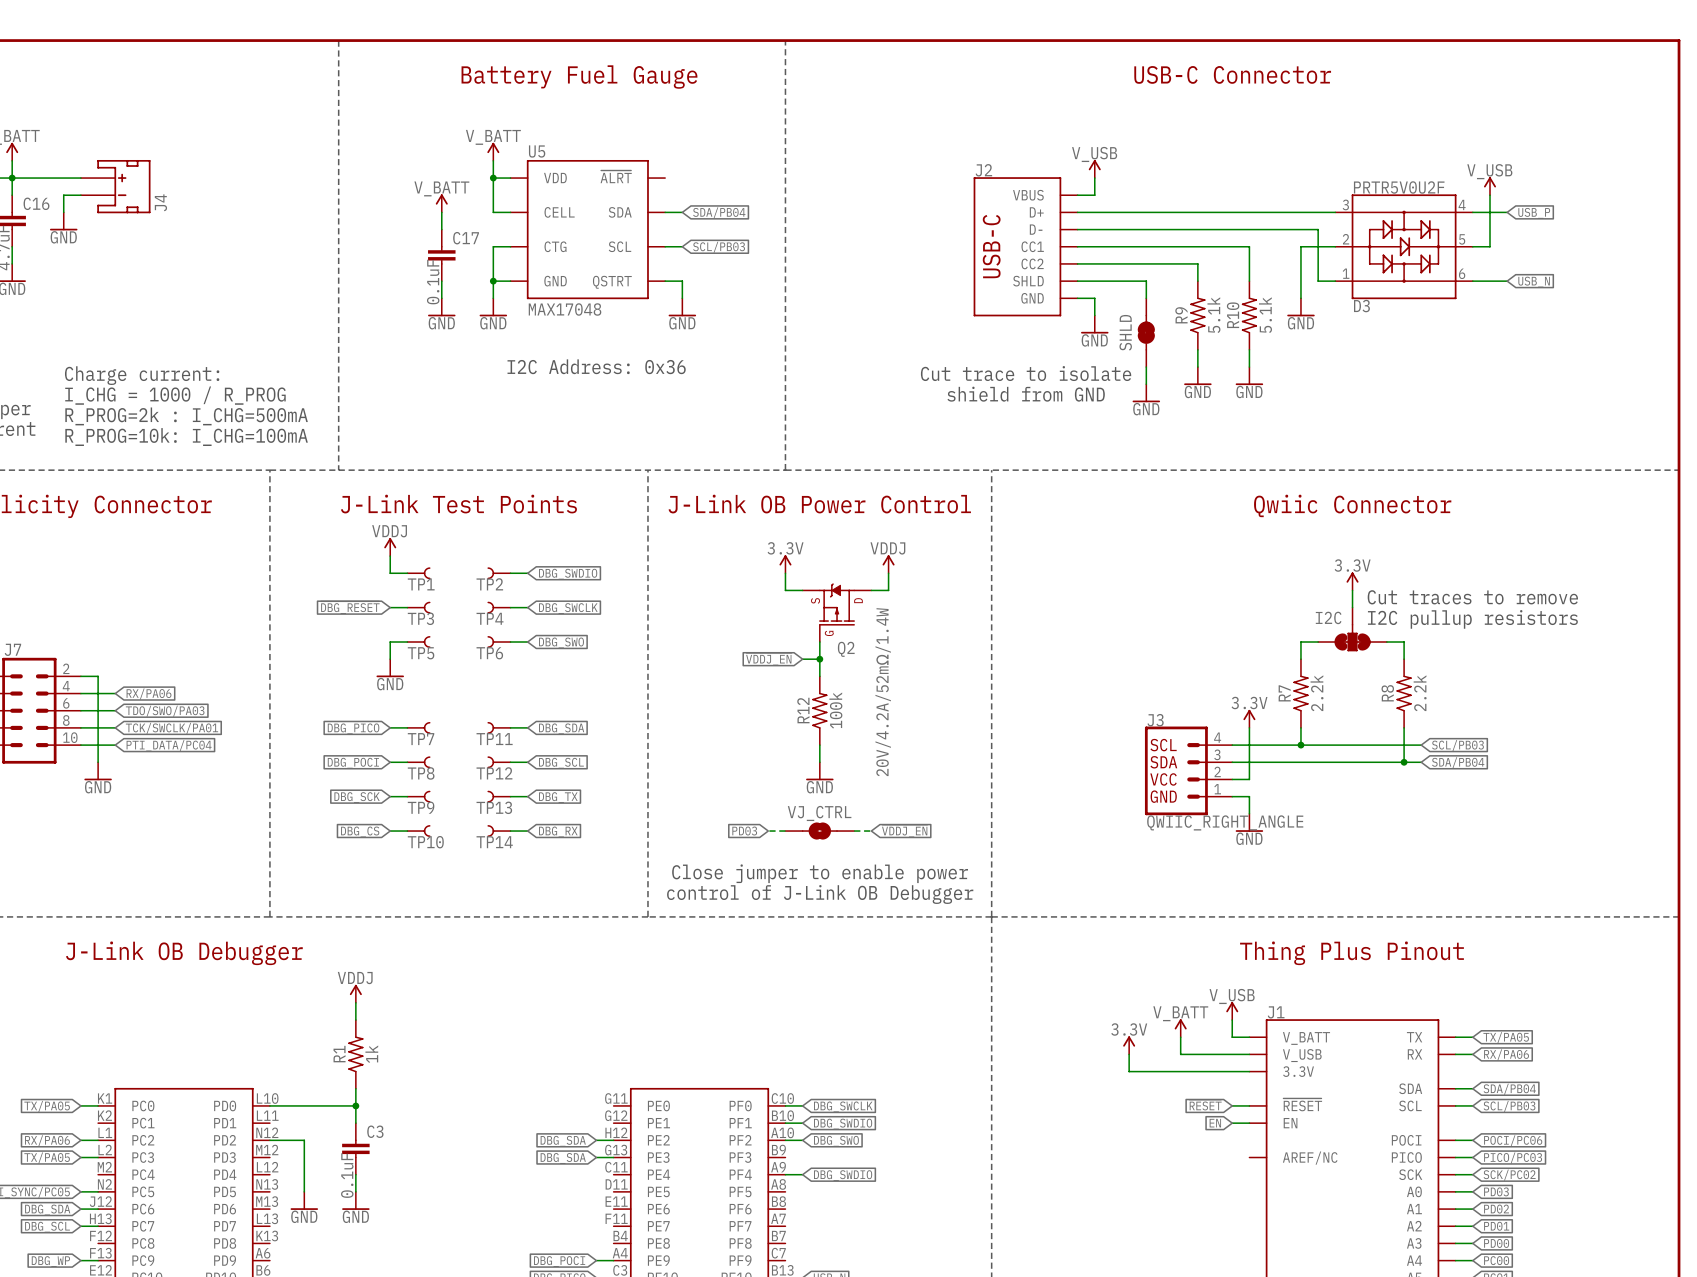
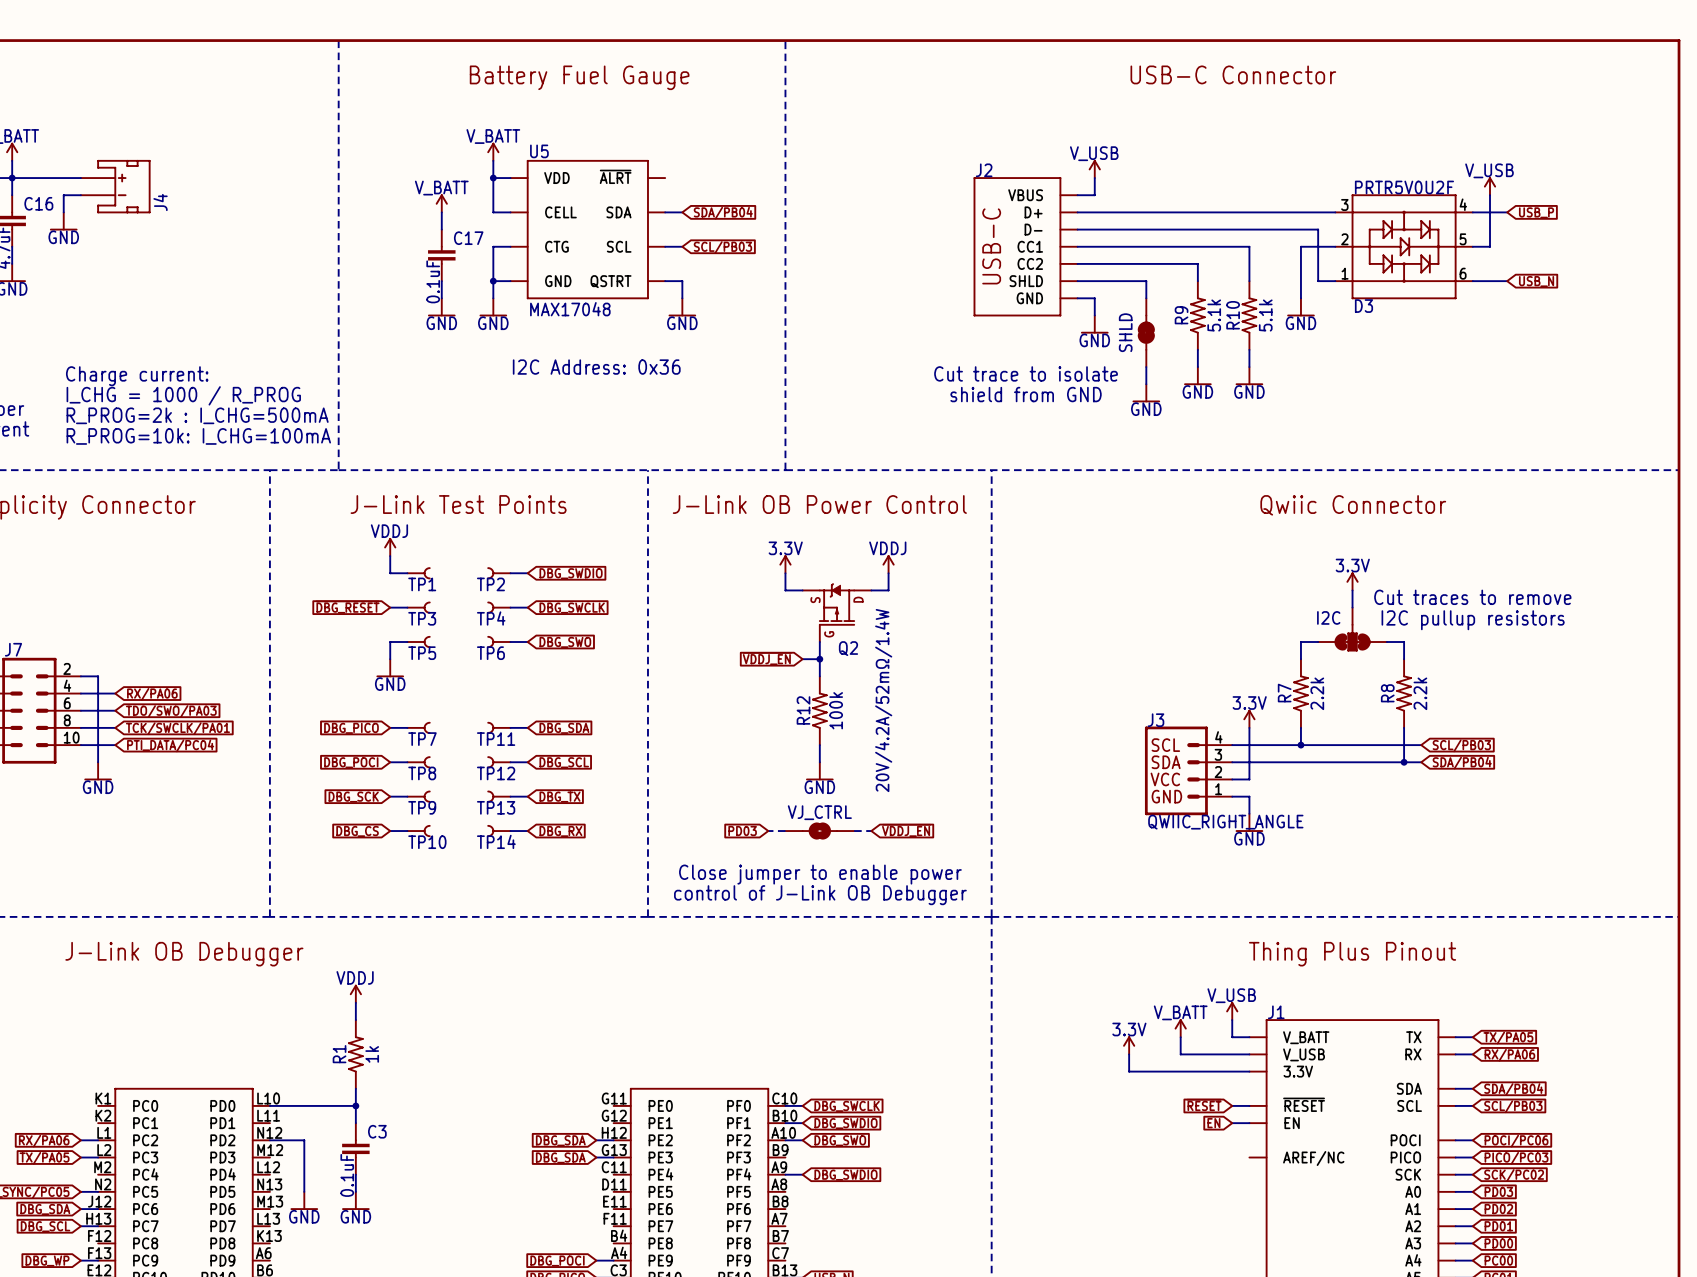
wire: (80, 1105) (98, 1105) -> none
global label: TX/PA05 (47, 1106) -> none

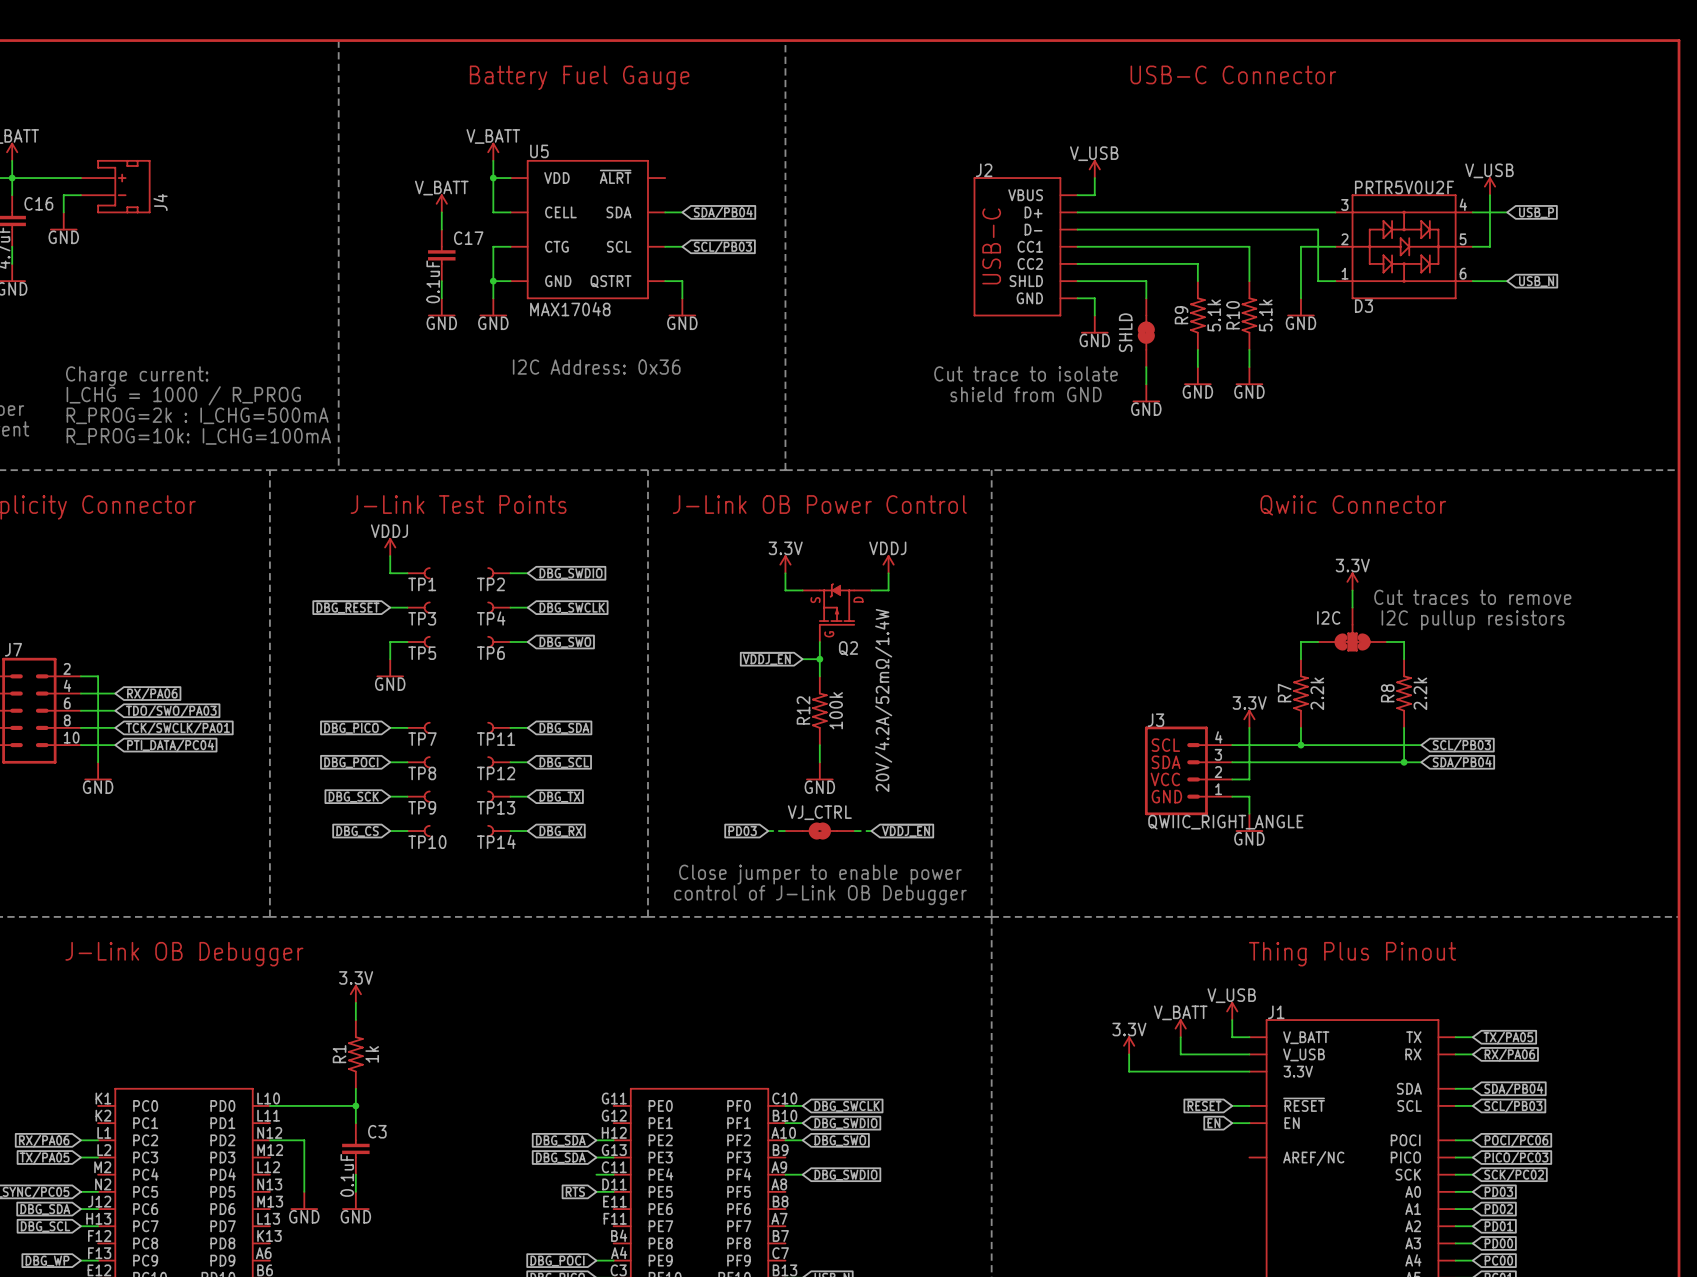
power symbol: VDDJ (355, 993) -> 3.3V (355, 993)
wire: none -> (596, 1174) (613, 1174)
global label: none -> RTS (575, 1191)
wire: none -> (596, 1191) (613, 1191)

